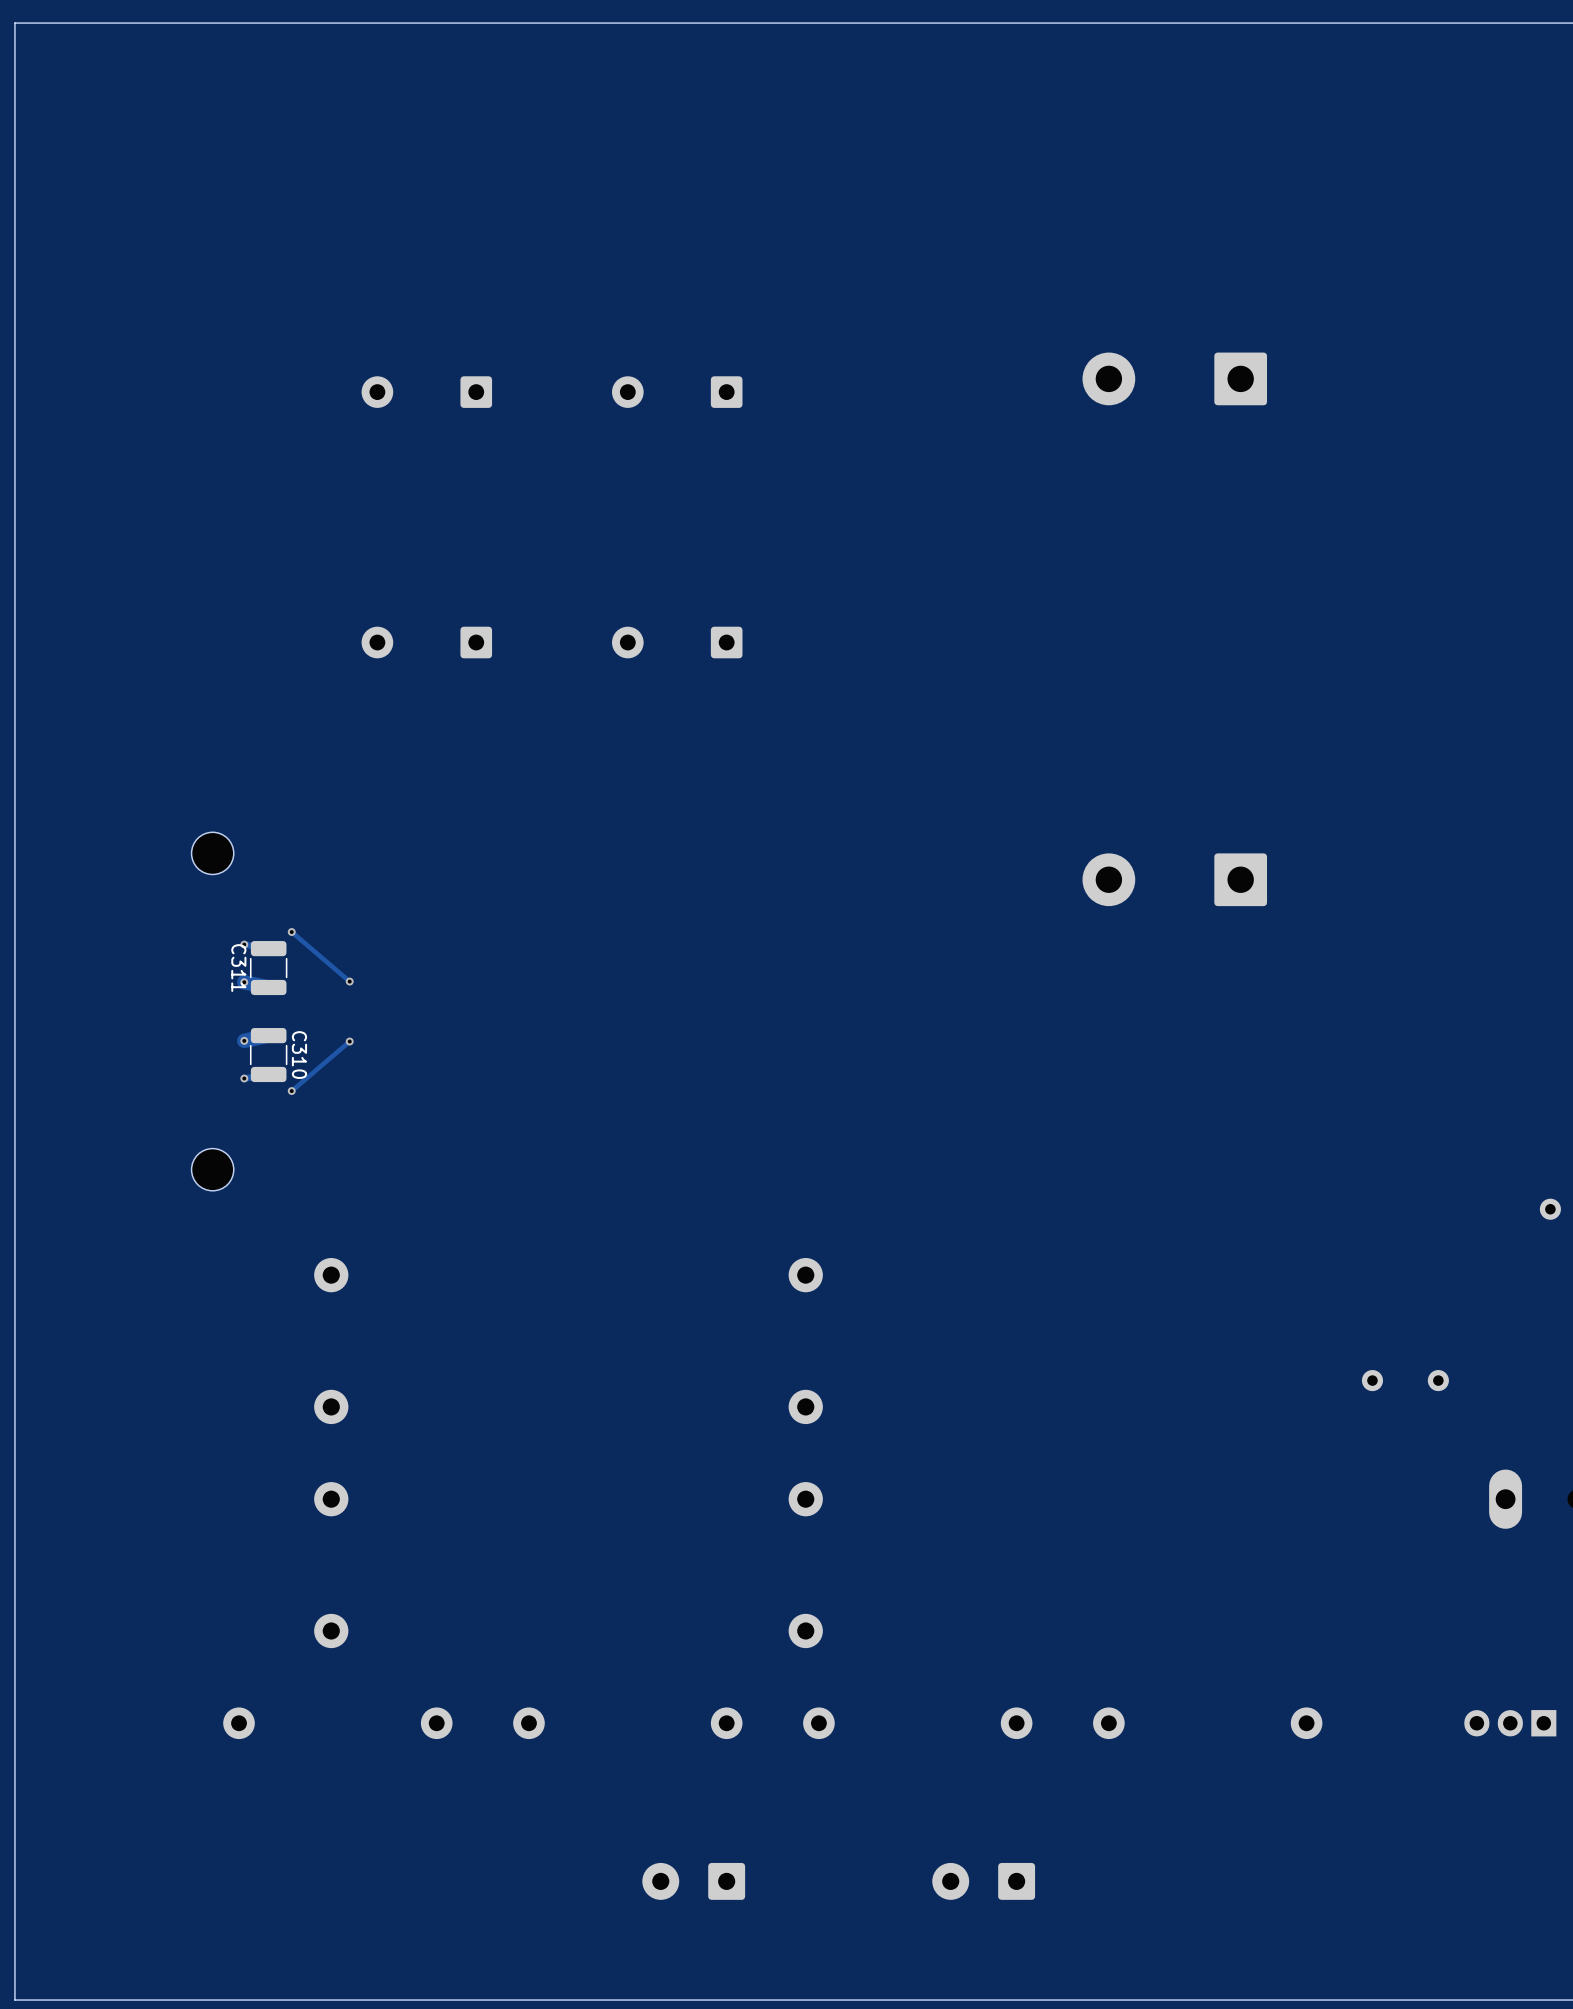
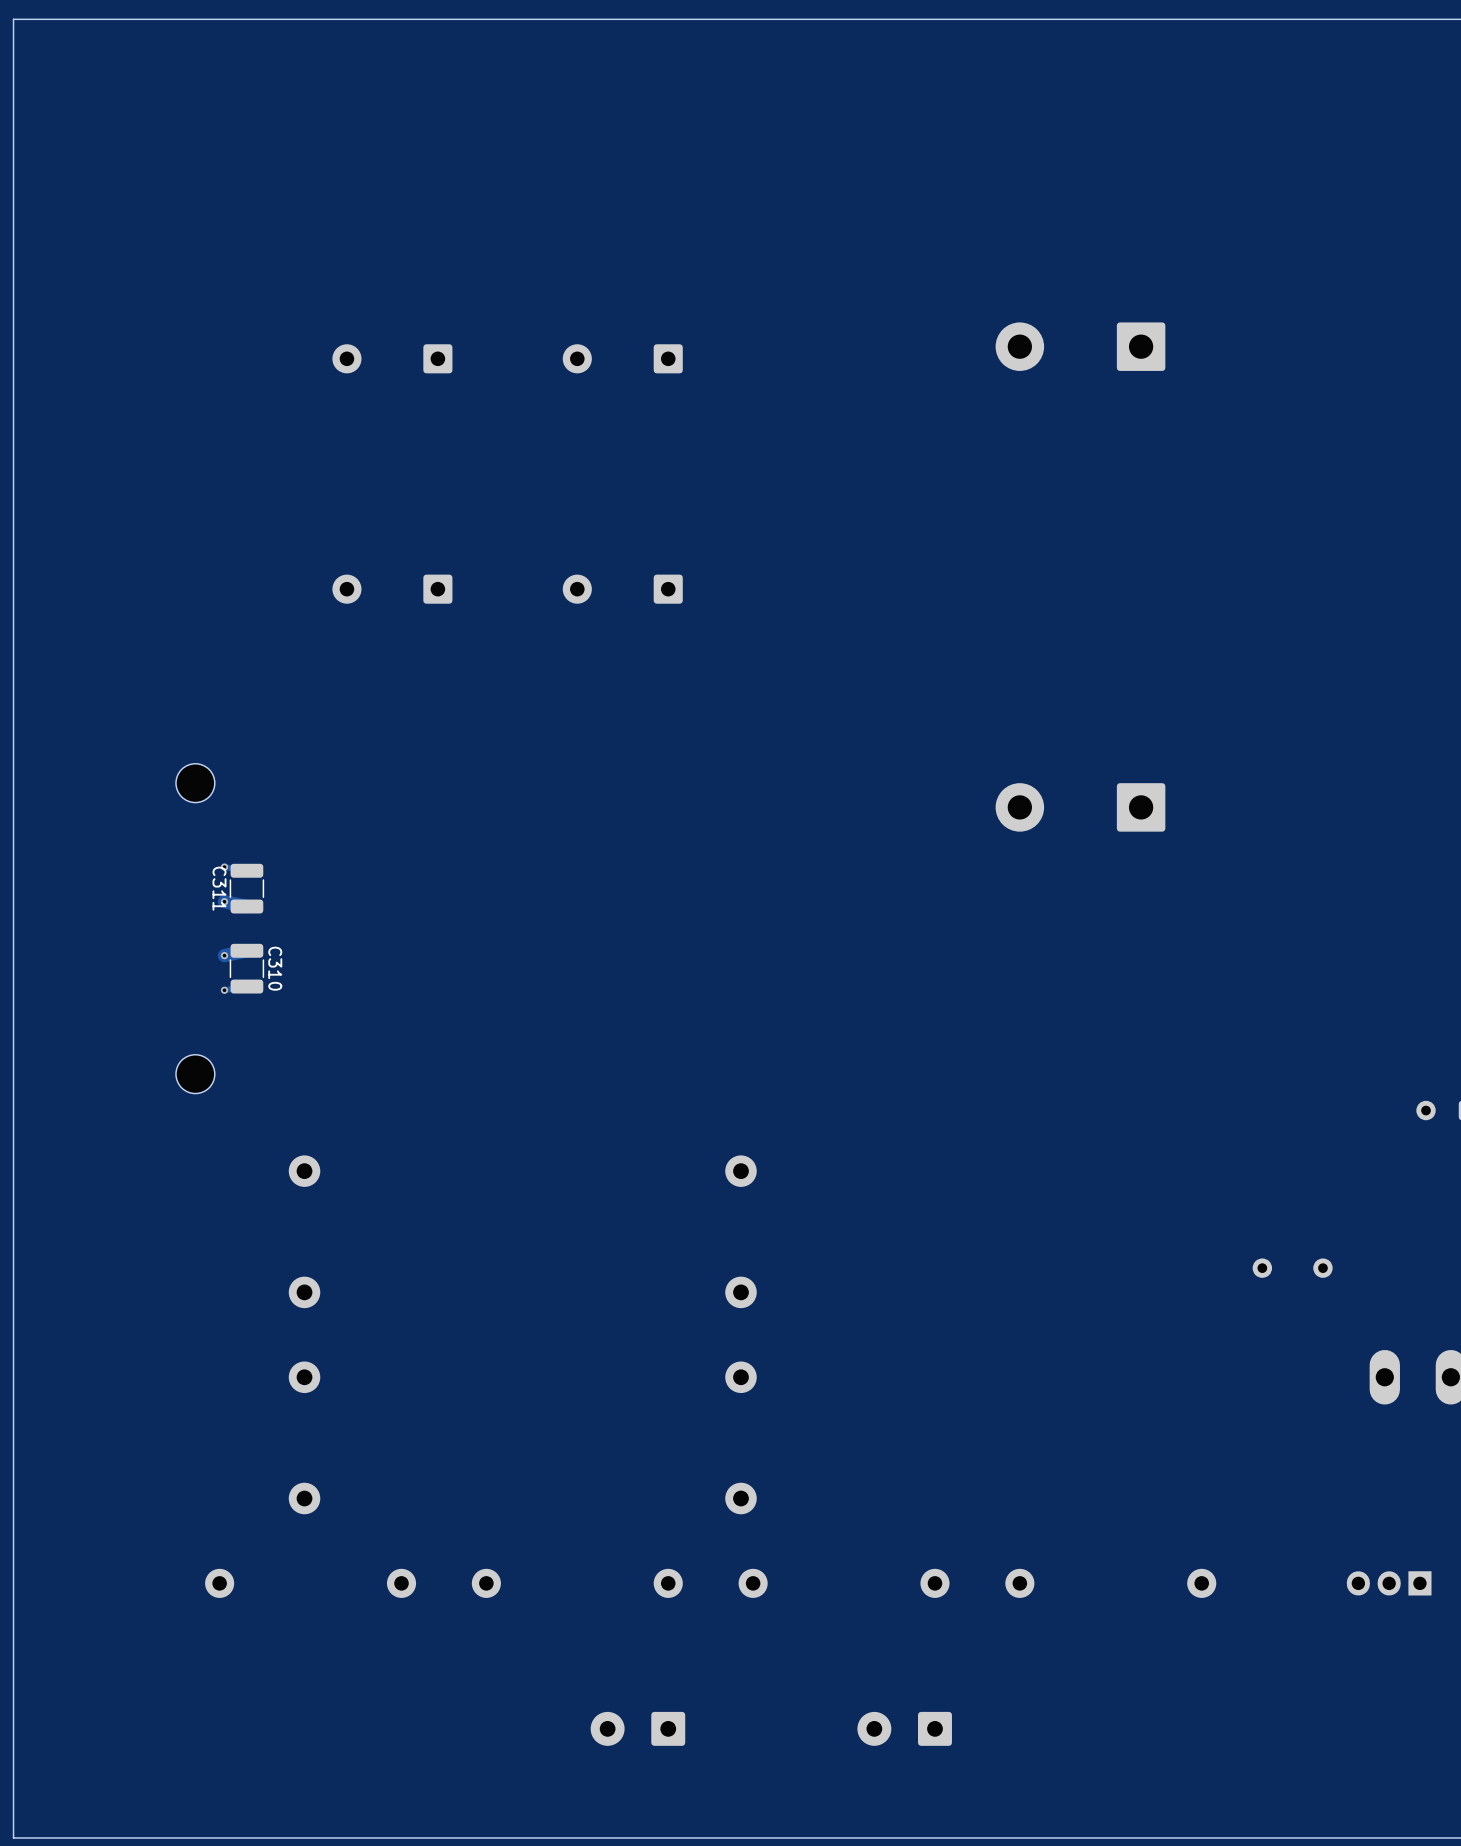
track: (291, 932) (349, 981) -> none
via: (291, 932) -> none
via: (349, 981) -> none
track: (349, 1041) (291, 1091) -> none
via: (349, 1041) -> none
via: (291, 1091) -> none

